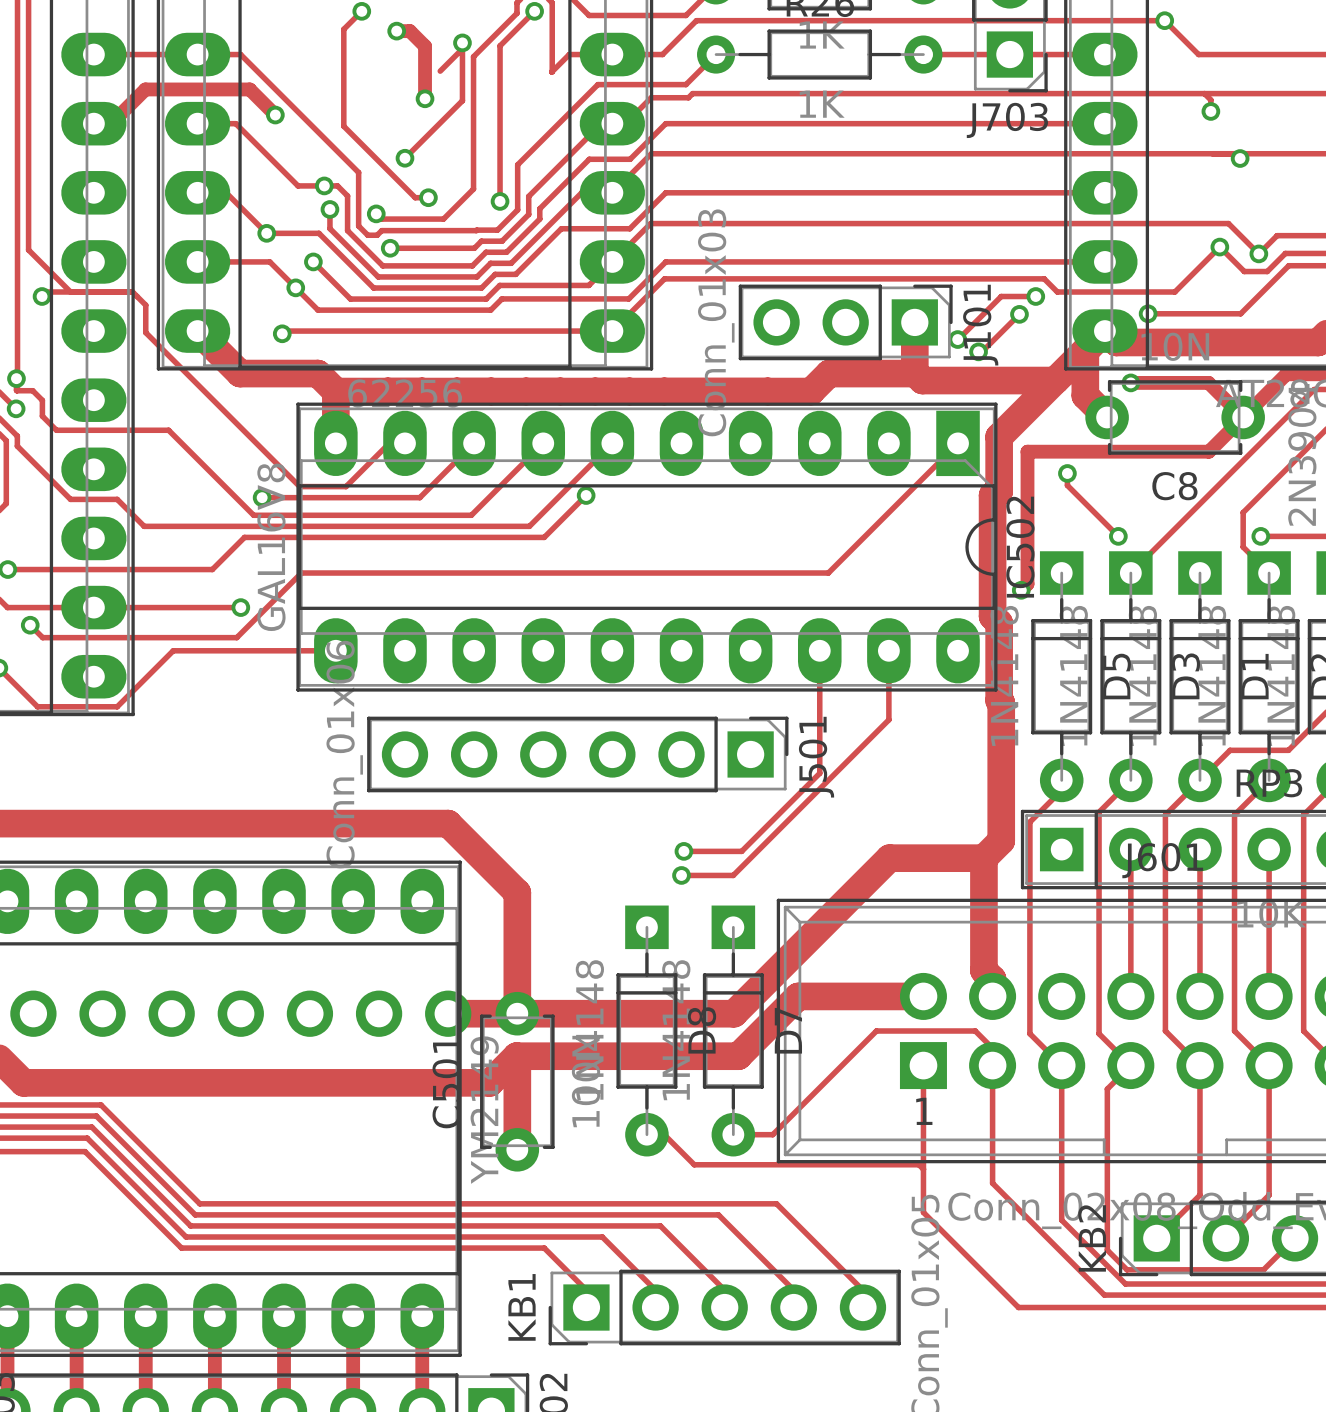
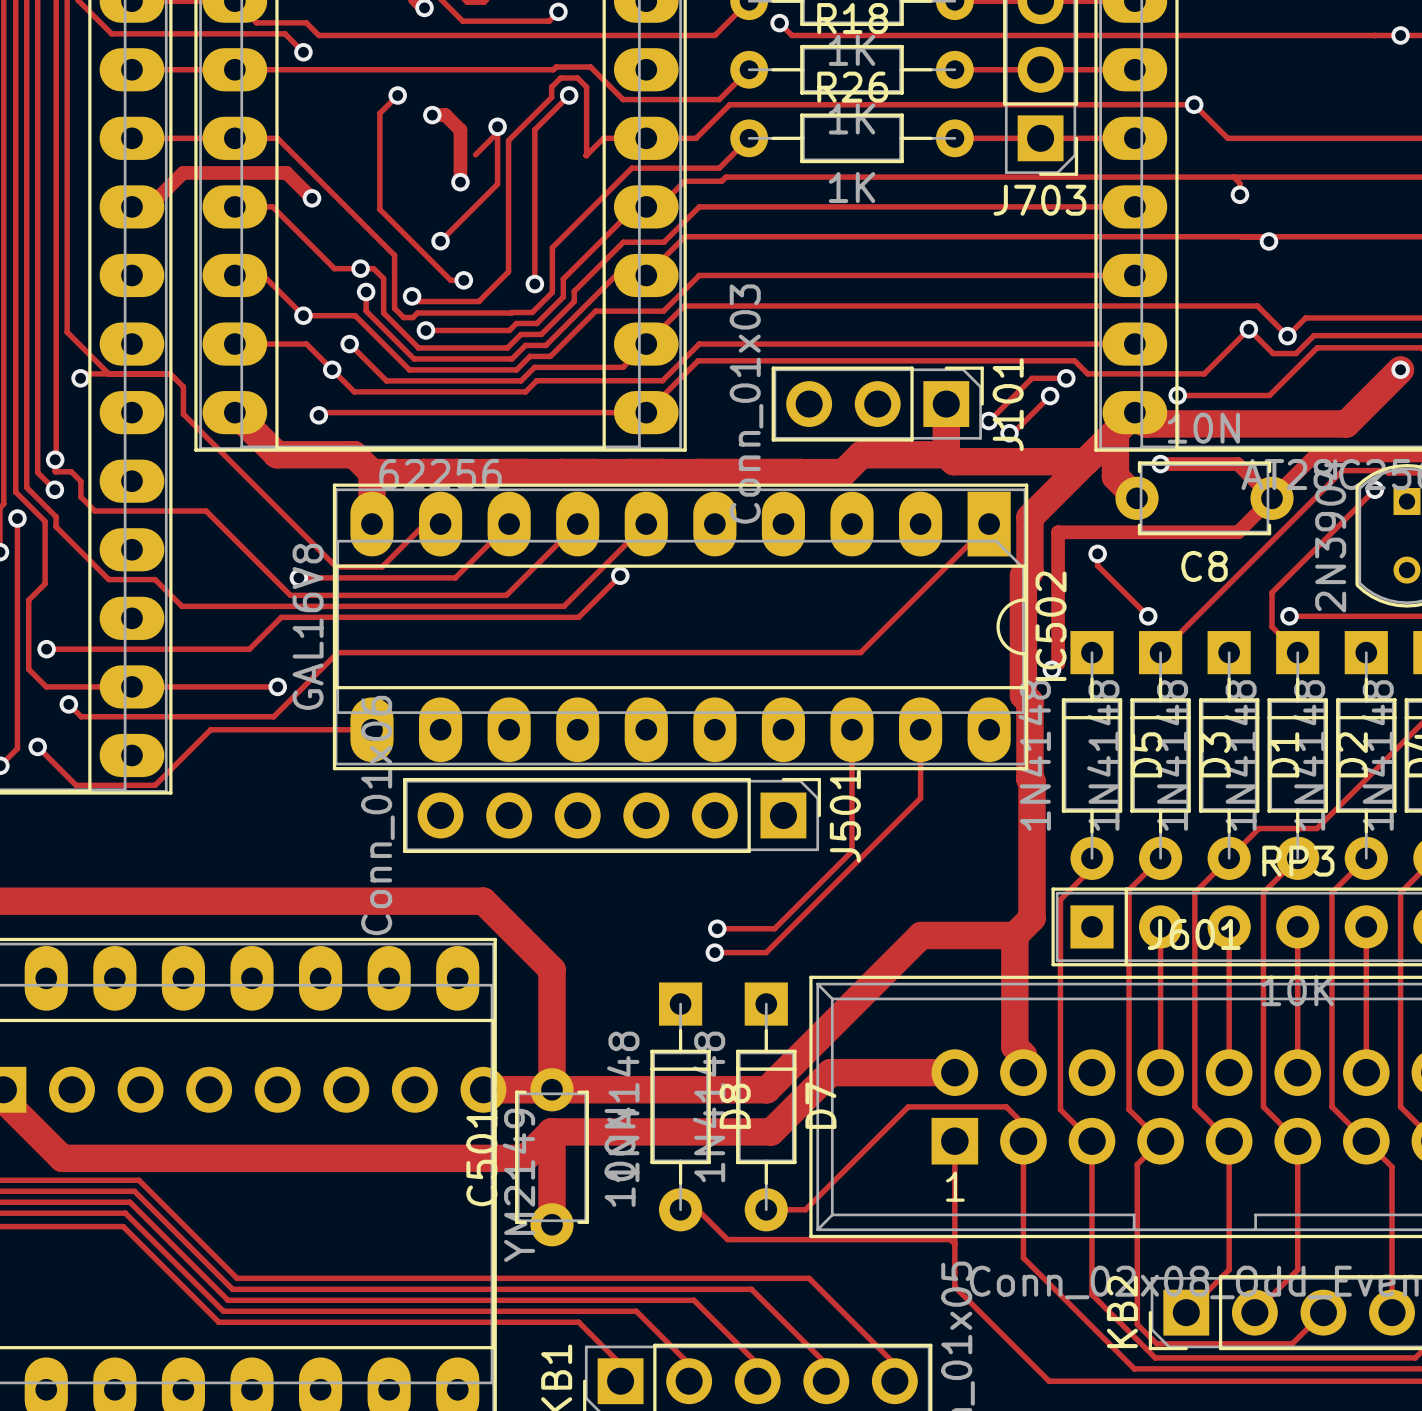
J501 position: (577, 754) -> (612, 815)

